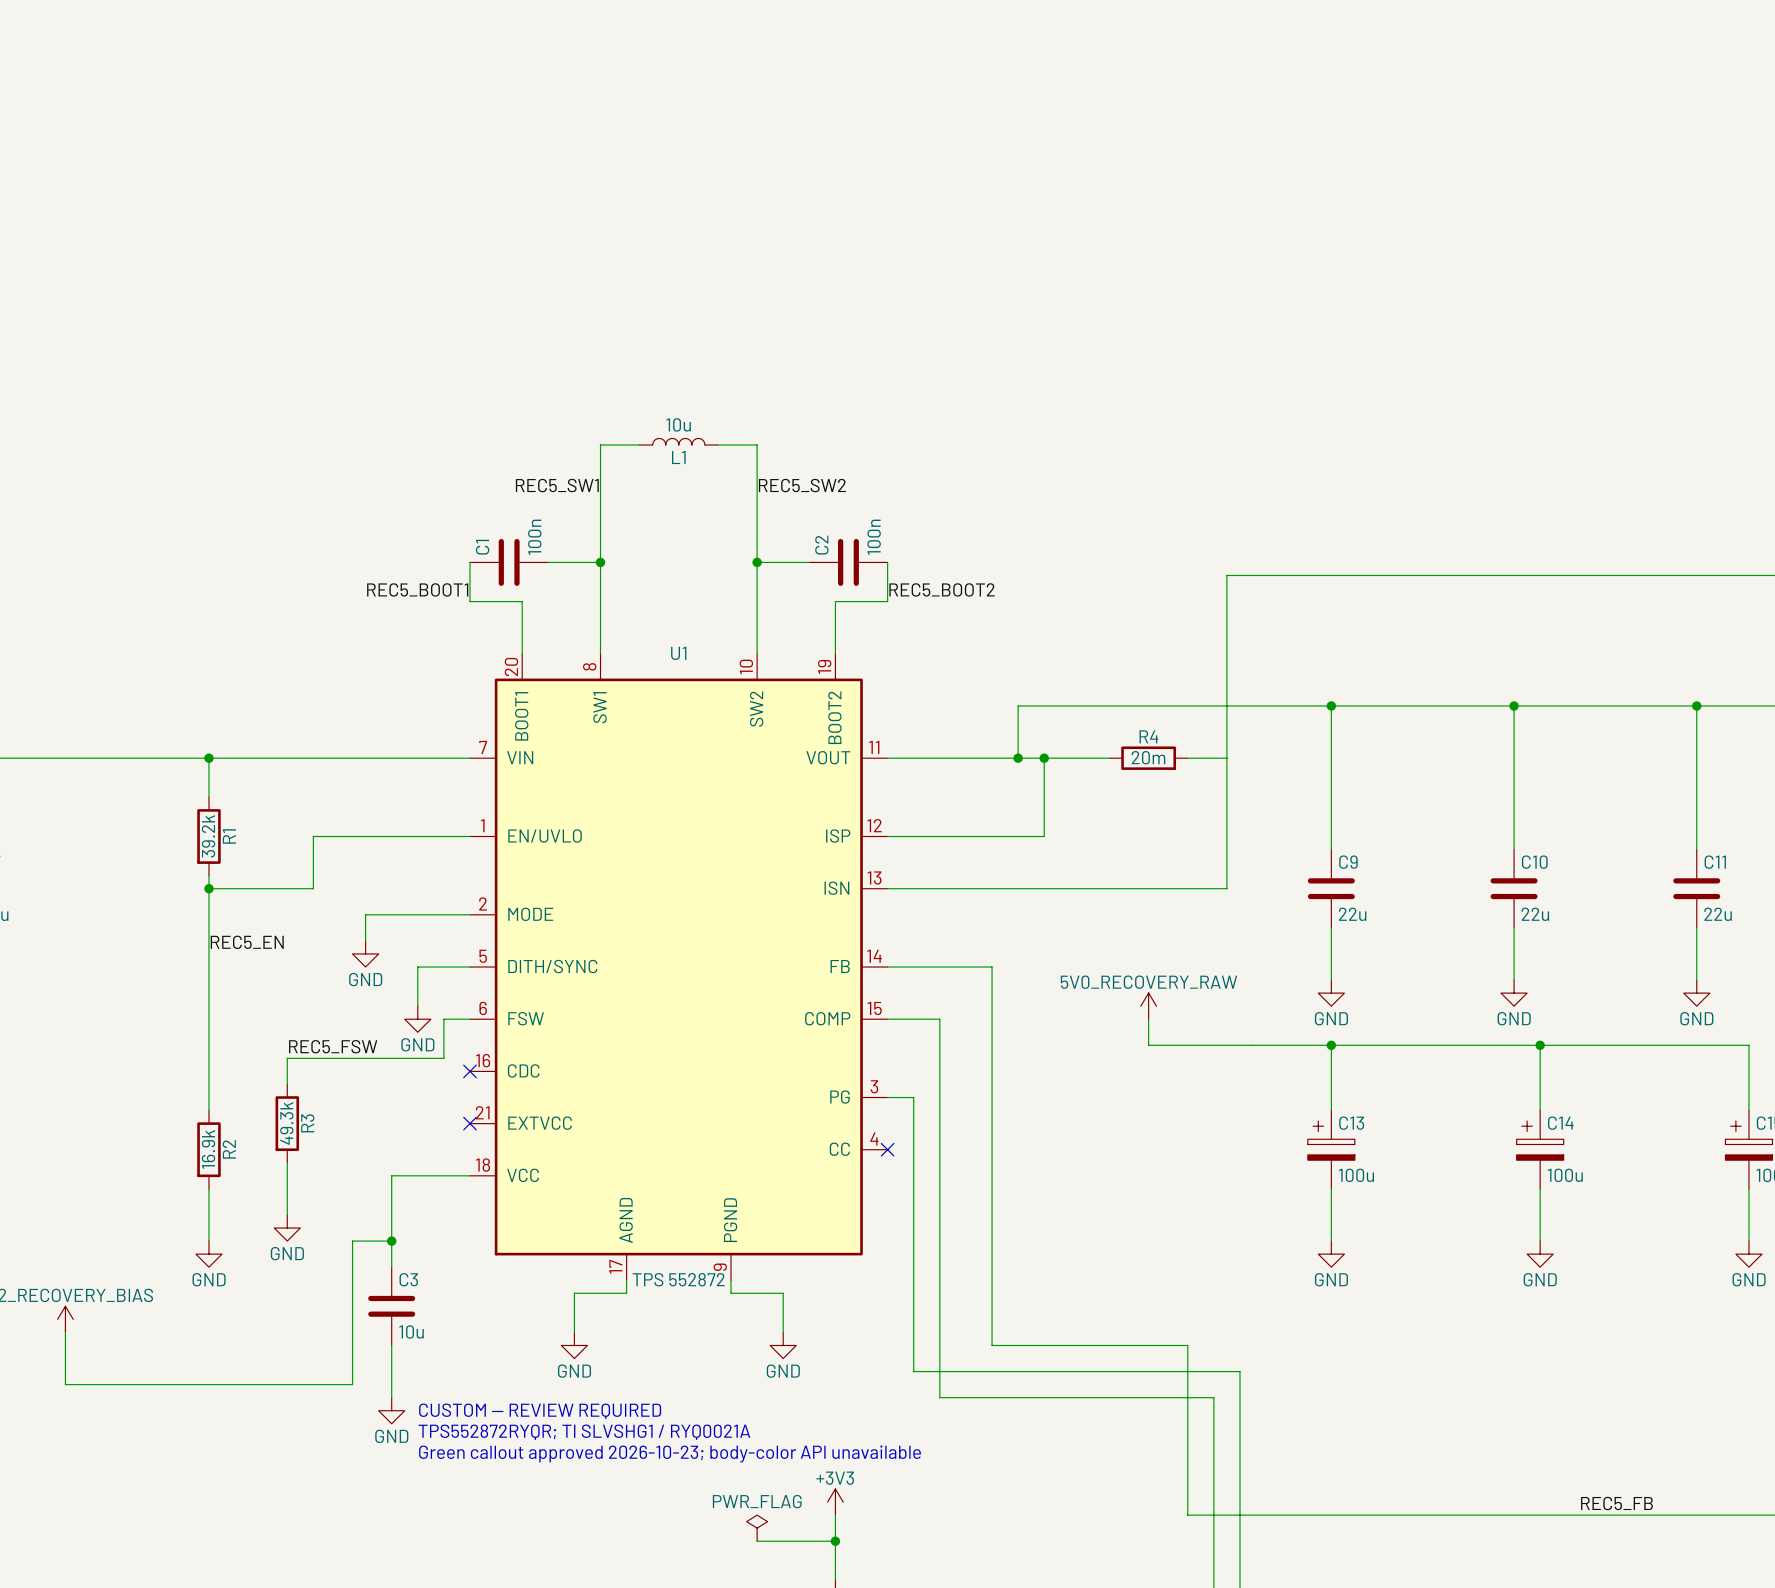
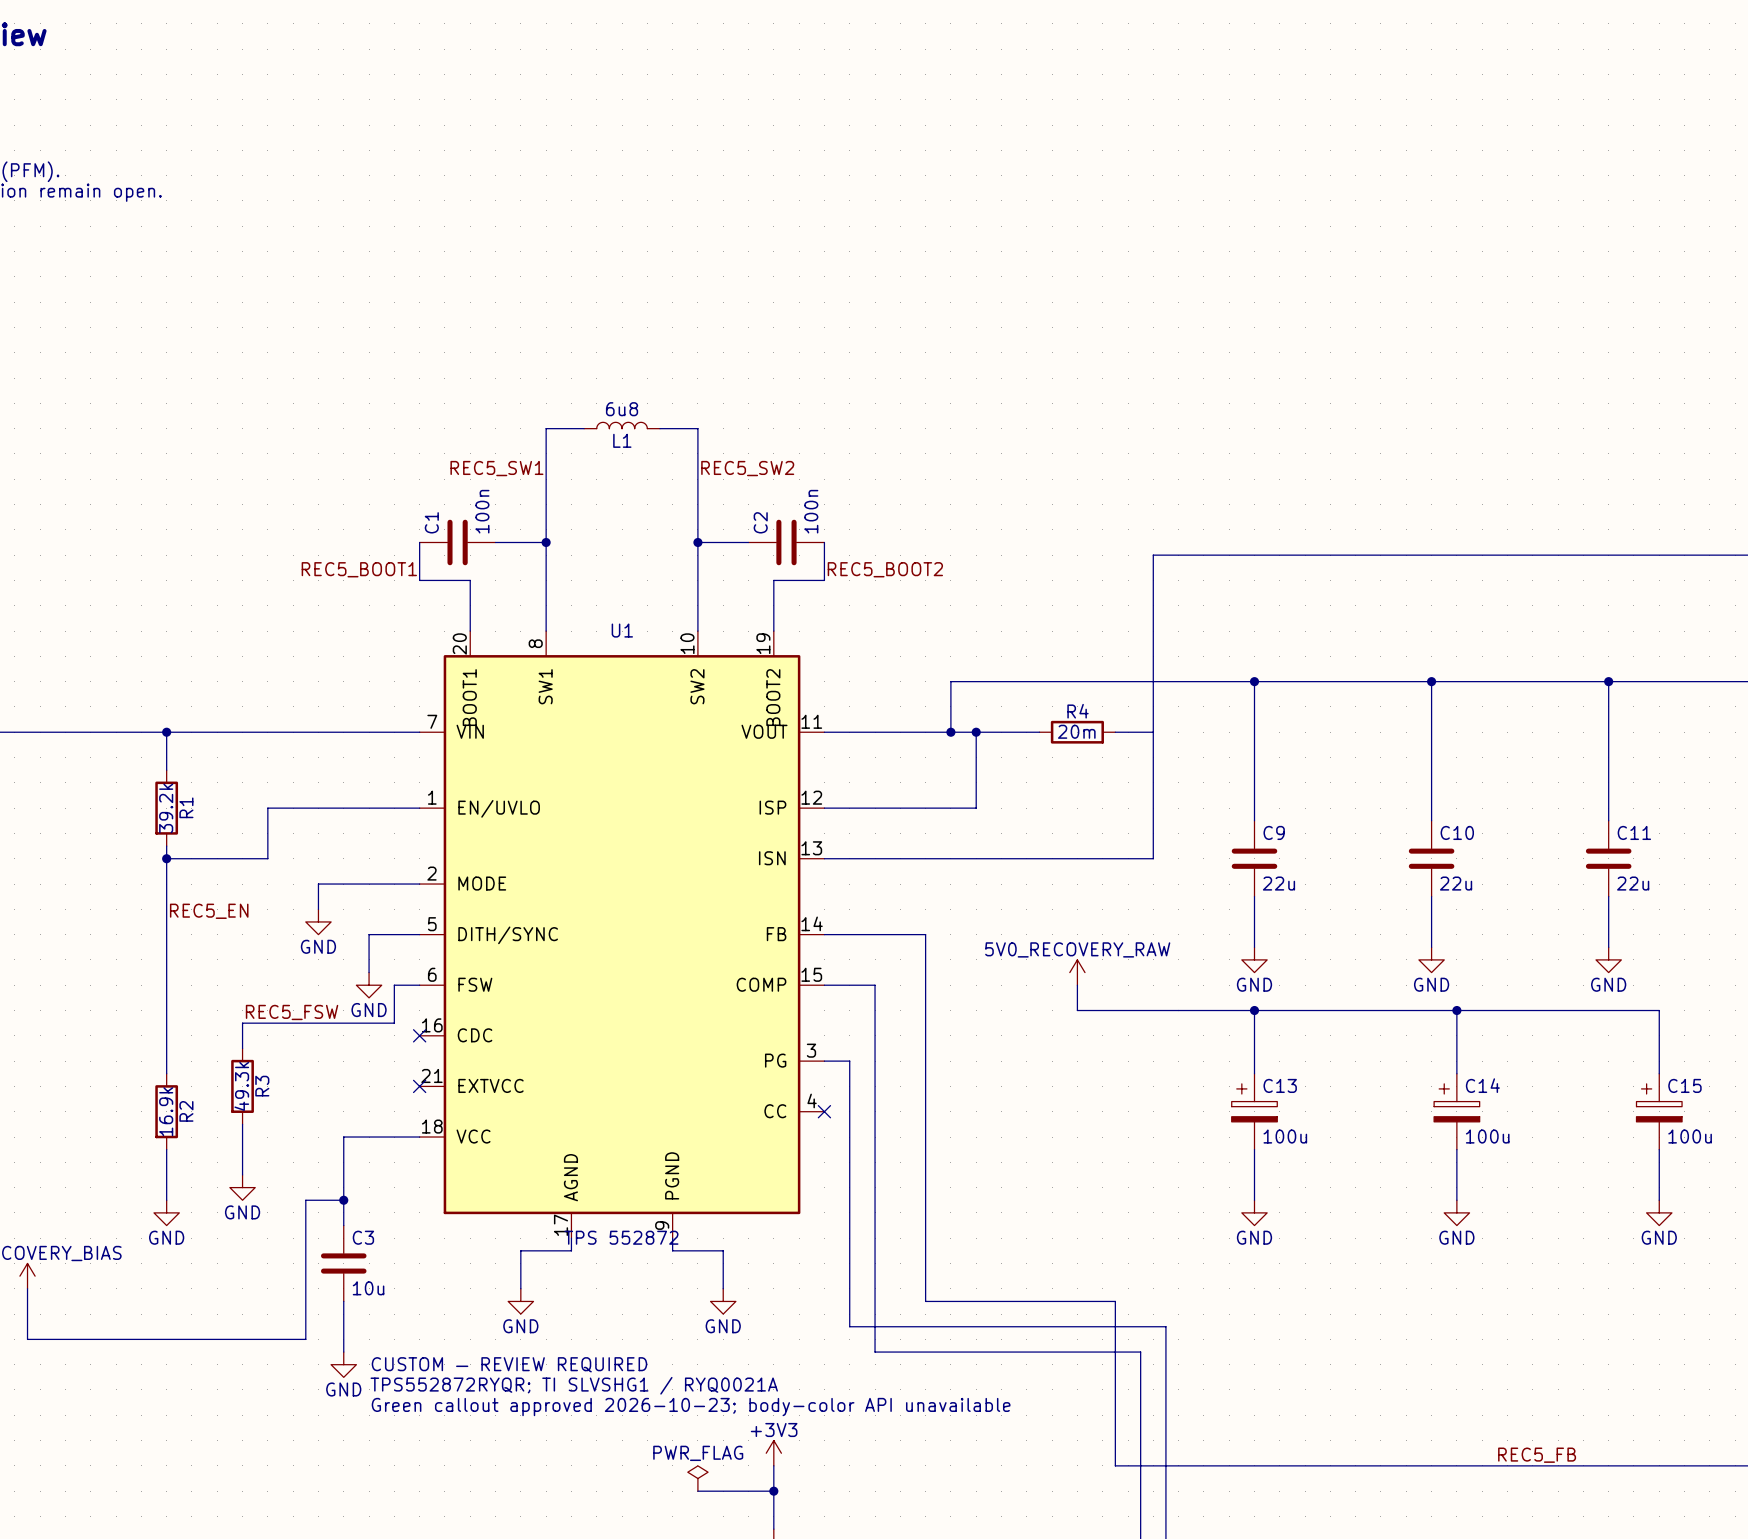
L1 value: 10u (678, 424) -> 6u8 (622, 409)

